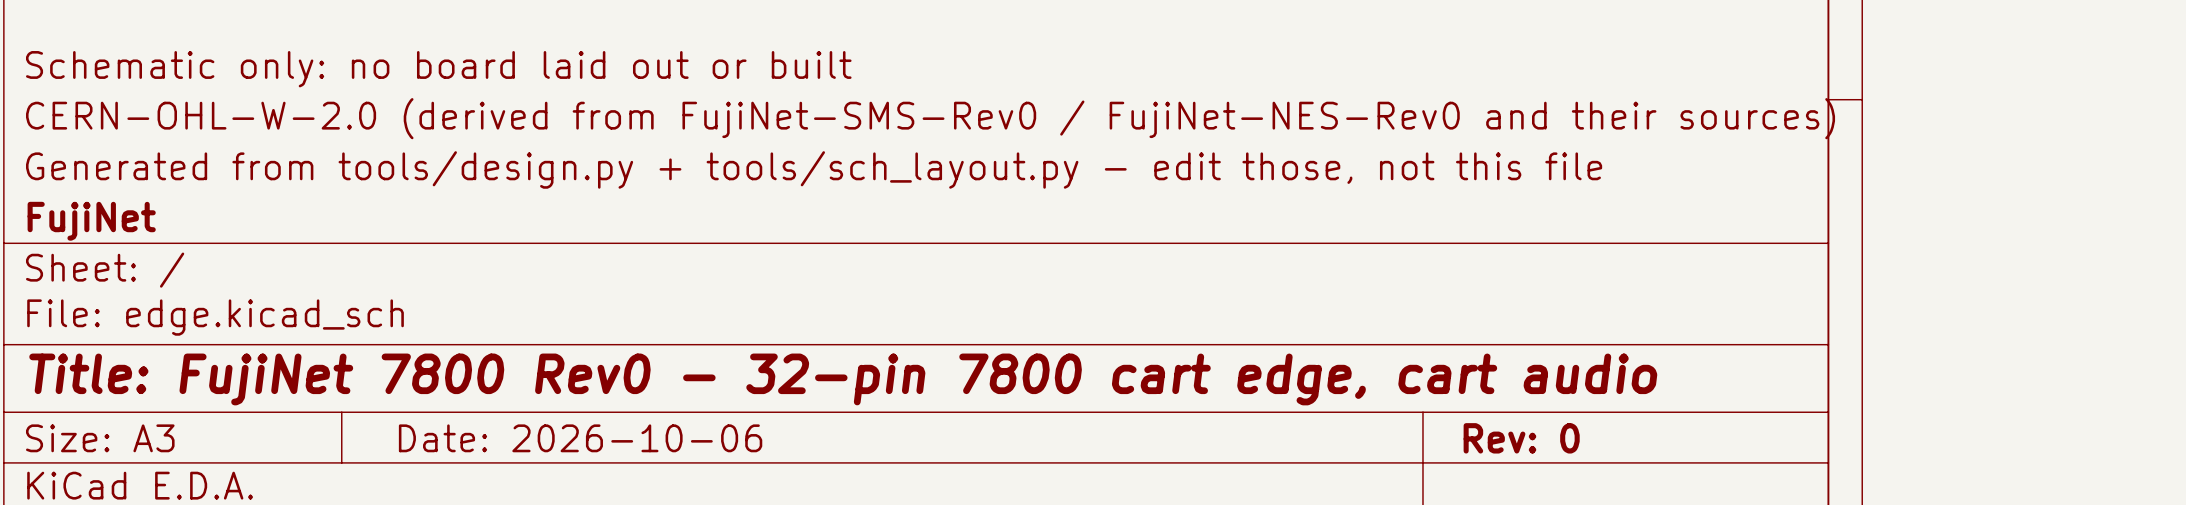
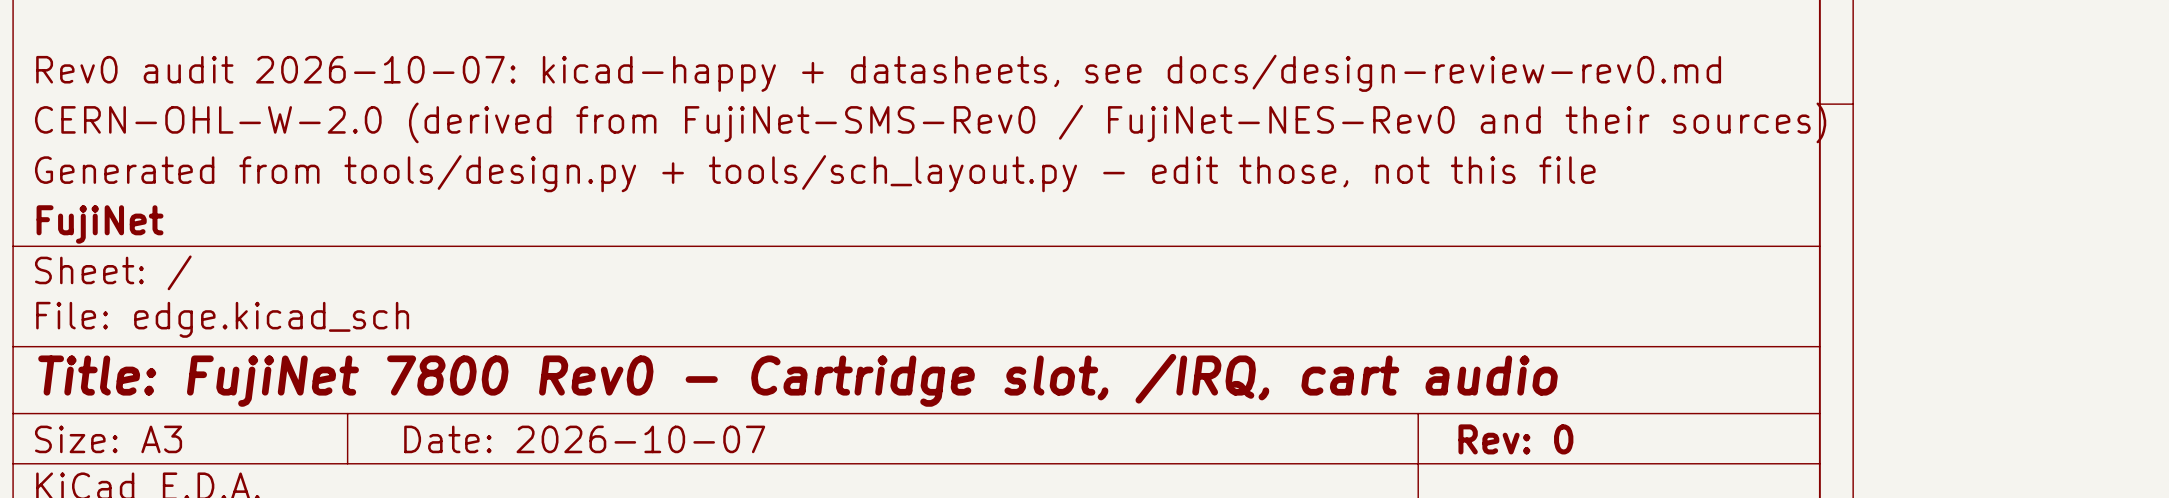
title block: Schematic only: no board laid out or built (438, 69) -> Rev0 audit 2026-10-07: kicad-happy + datasheets, see docs/design-review-rev0.md (878, 73)
title block: Title: FujiNet 7800 Rev0 - 32-pin 7800 cart edge, cart audio (843, 379) -> Title: FujiNet 7800 Rev0 - Cartridge slot, /IRQ, cart audio (798, 380)
title block: Date: 2026-10-06 (580, 438) -> Date: 2026-10-07 (584, 439)

